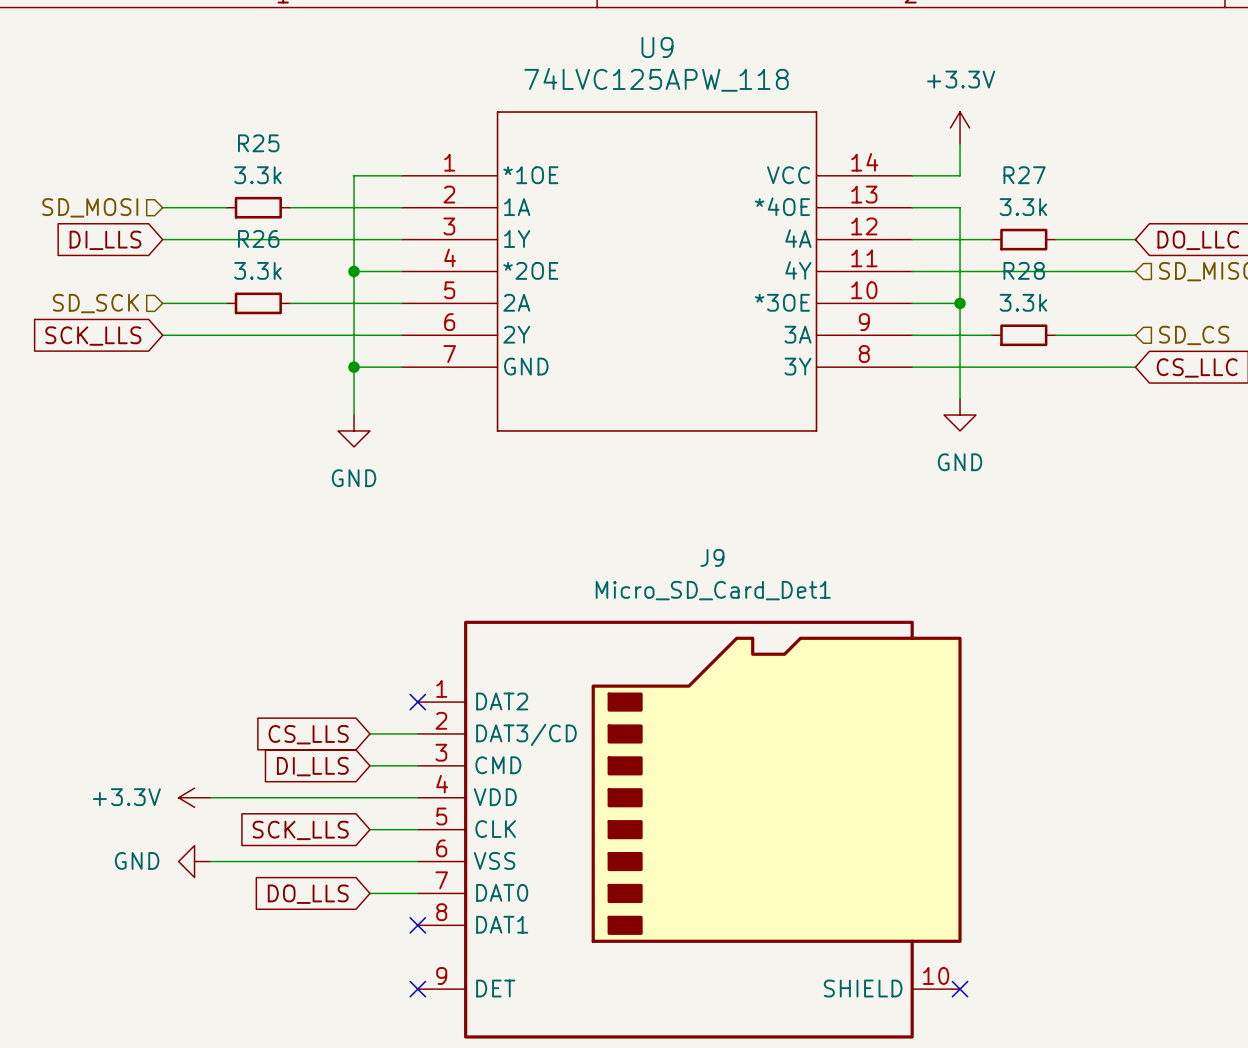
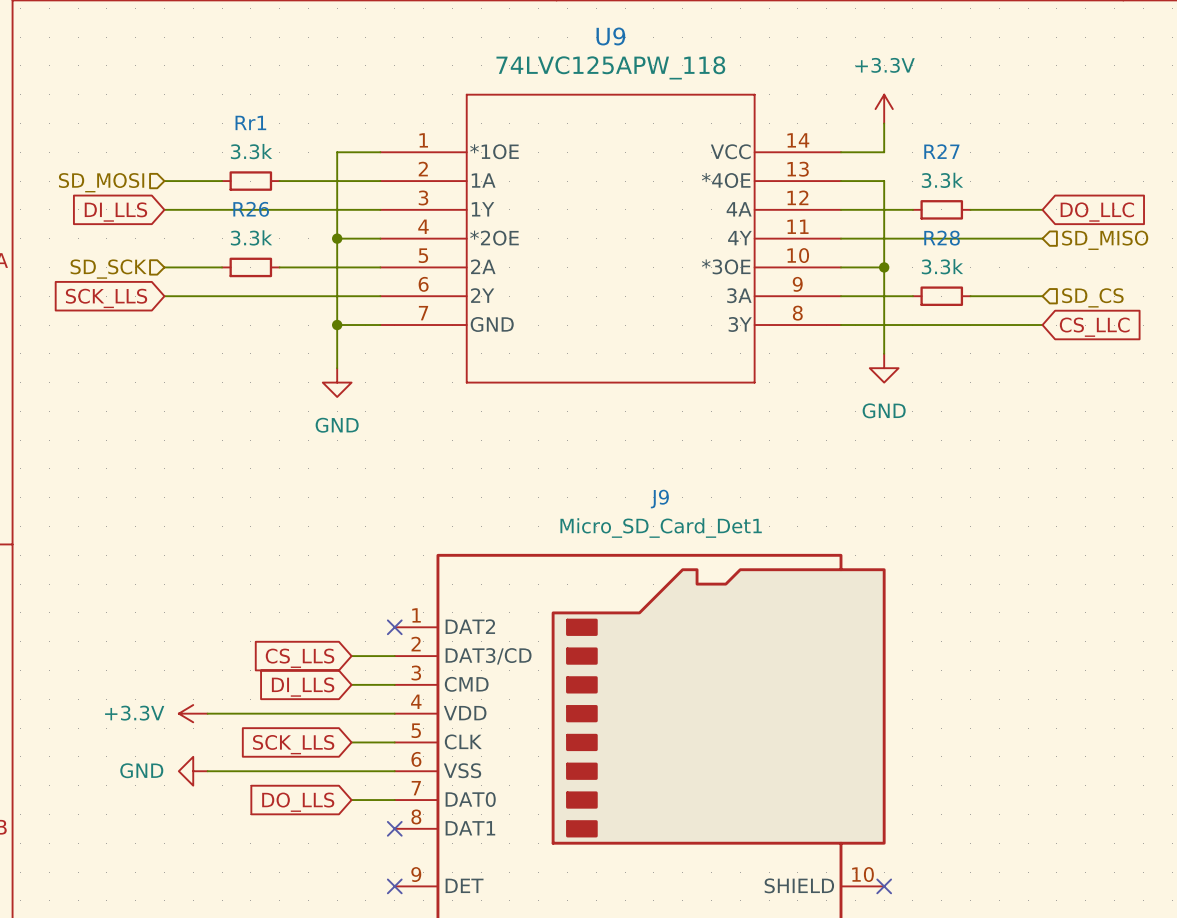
R25 name: R25 (258, 143) -> Rr1 (250, 122)

